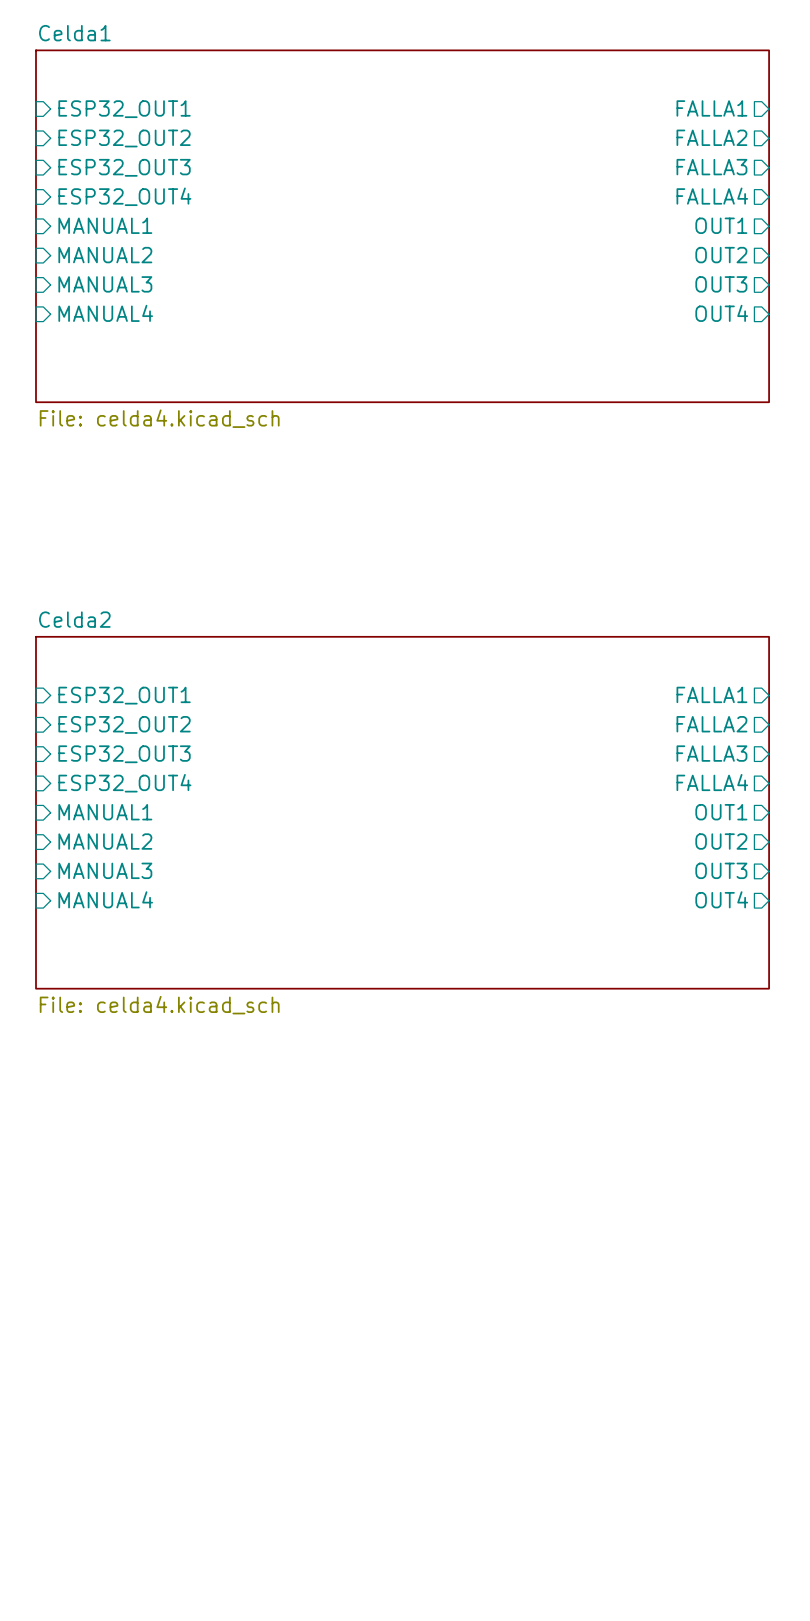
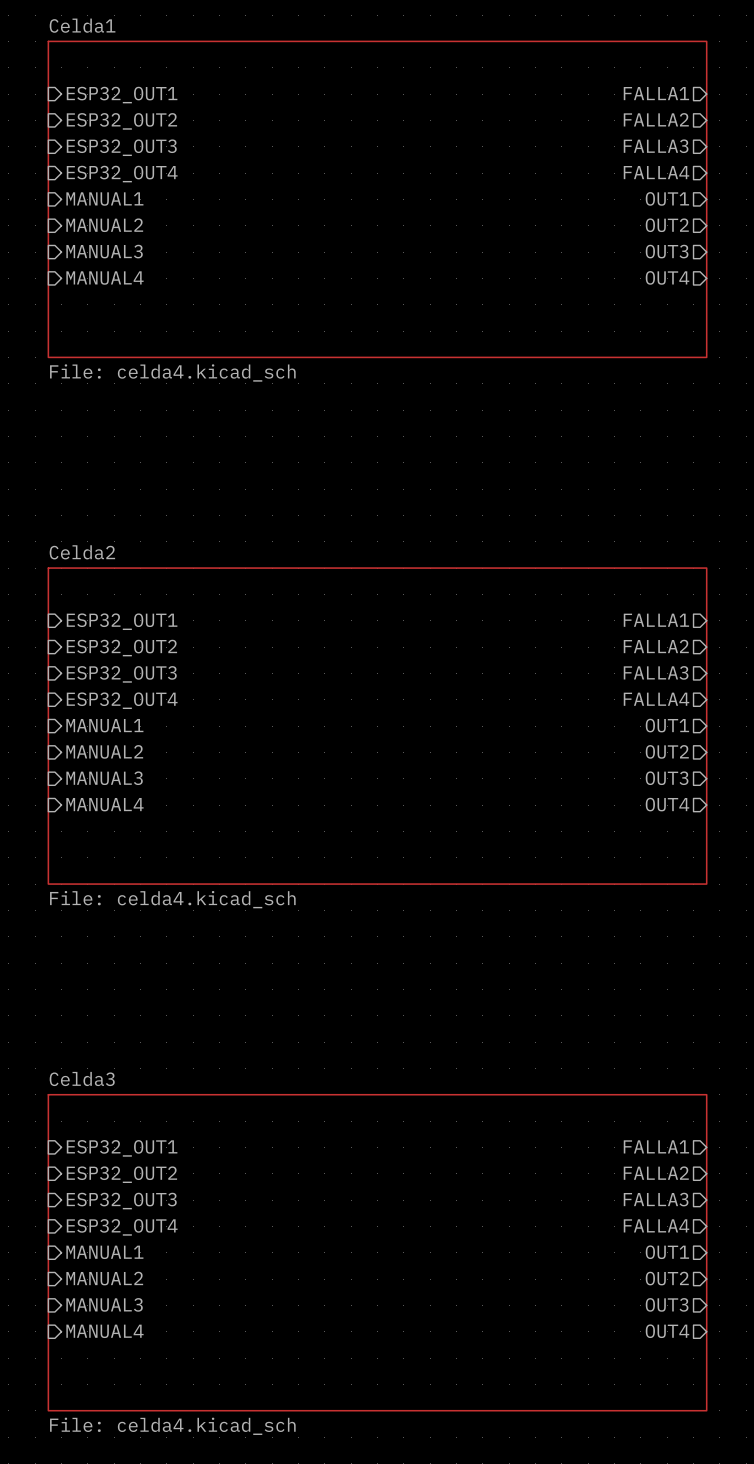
sheet pin: none -> FALLA1 (656, 1146)
sheet pin: none -> ESP32_OUT1 (122, 1148)
sheet pin: none -> FALLA2 (656, 1173)
sheet pin: none -> ESP32_OUT2 (121, 1174)
sheet pin: none -> ESP32_OUT3 (121, 1201)
sheet pin: none -> FALLA3 (656, 1199)
sheet pin: none -> FALLA4 (656, 1225)
sheet pin: none -> ESP32_OUT4 (122, 1227)
sheet pin: none -> MANUAL1 (104, 1252)
sheet pin: none -> OUT1 (667, 1252)
sheet Celda3: none -> File: celda4.kicad_sch (377, 1252)
sheet pin: none -> MANUAL2 (104, 1278)
sheet pin: none -> OUT2 (667, 1278)
sheet pin: none -> MANUAL3 (104, 1304)
sheet pin: none -> OUT3 (667, 1304)
sheet pin: none -> MANUAL4 (104, 1331)
sheet pin: none -> OUT4 (667, 1331)

